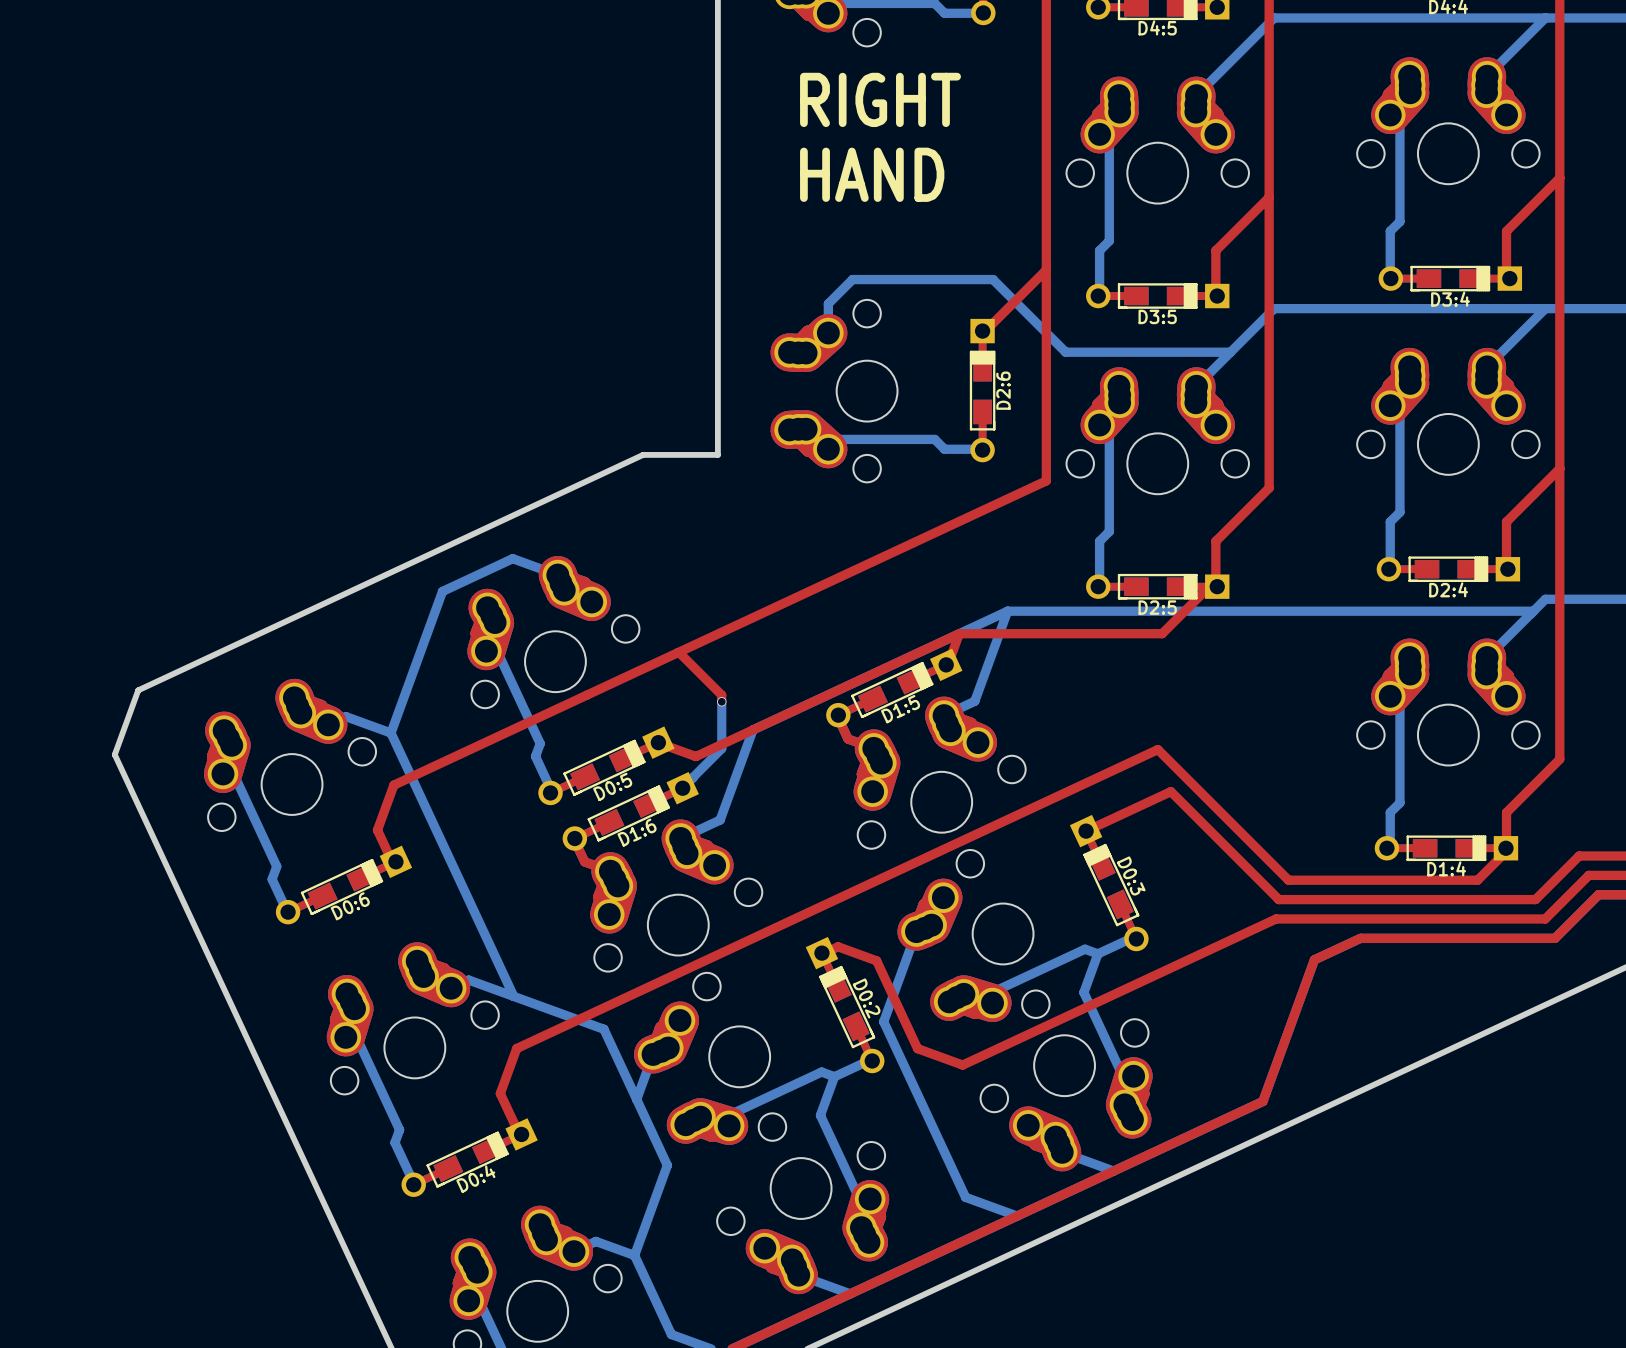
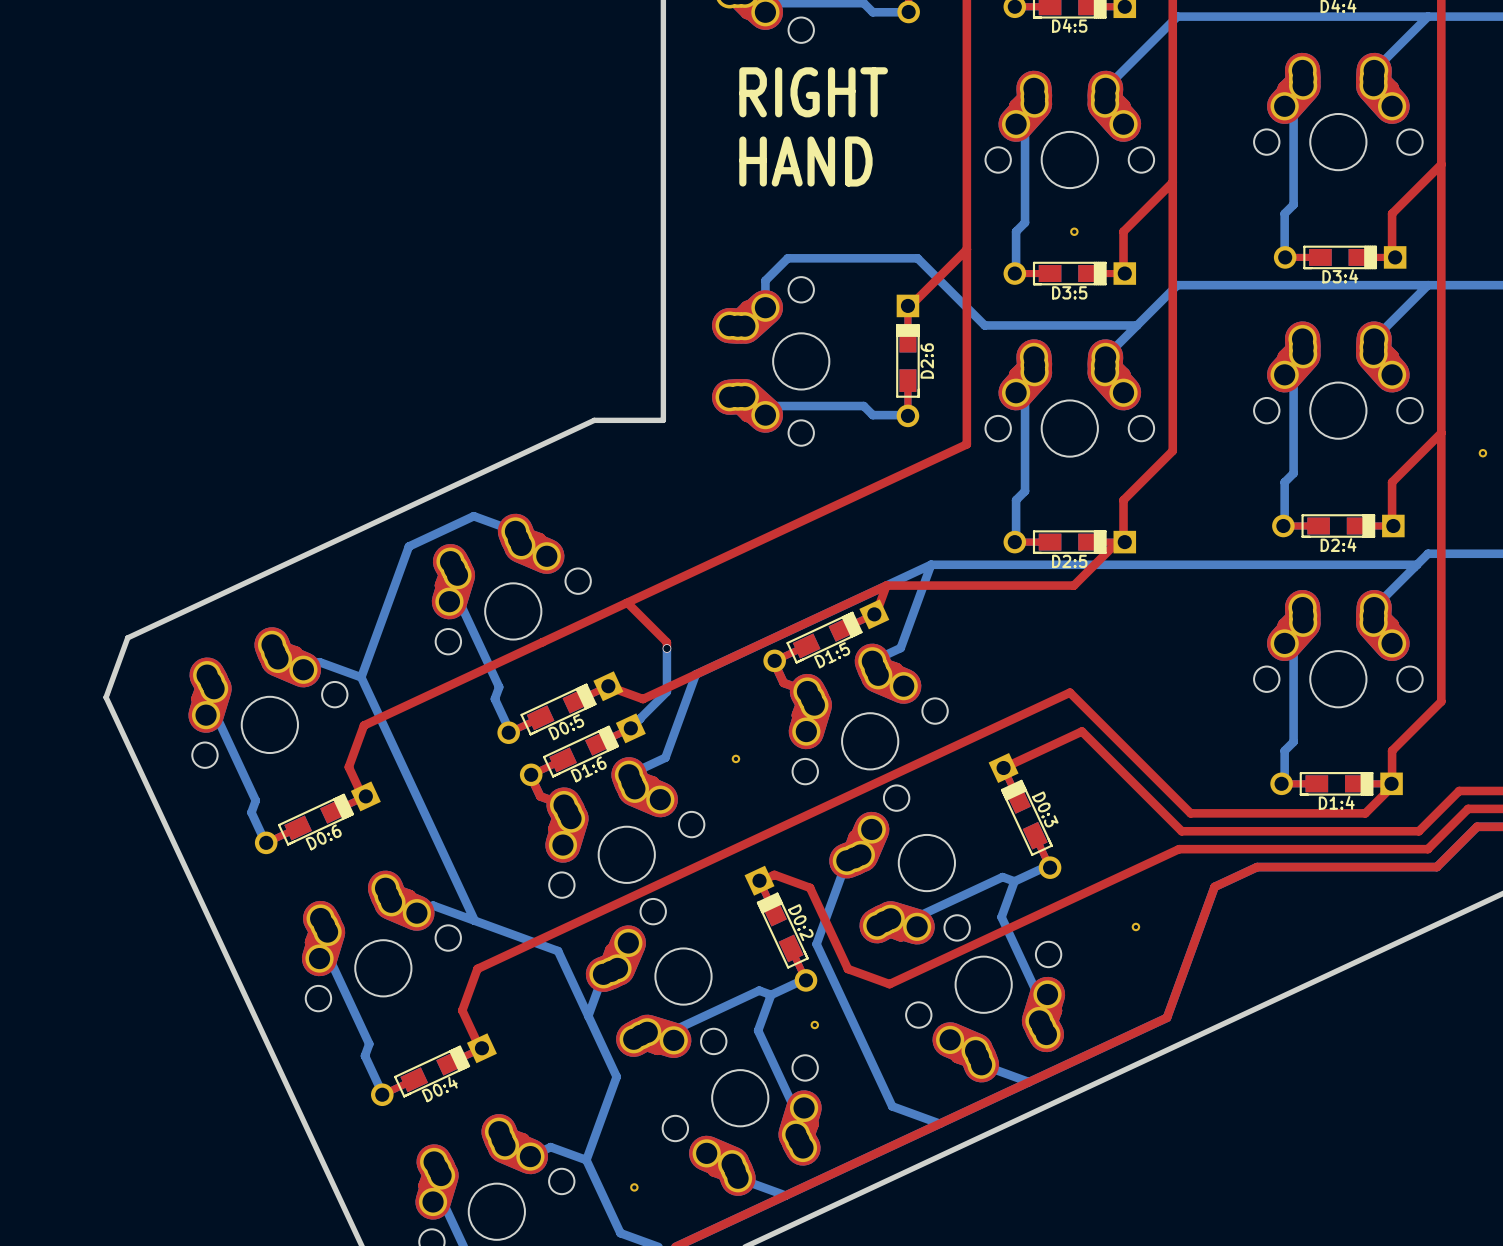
part: none -> (1074, 231)
part: none -> (1482, 453)
part: none -> (735, 758)
part: none -> (1135, 926)
part: none -> (814, 1024)
part: none -> (634, 1187)

